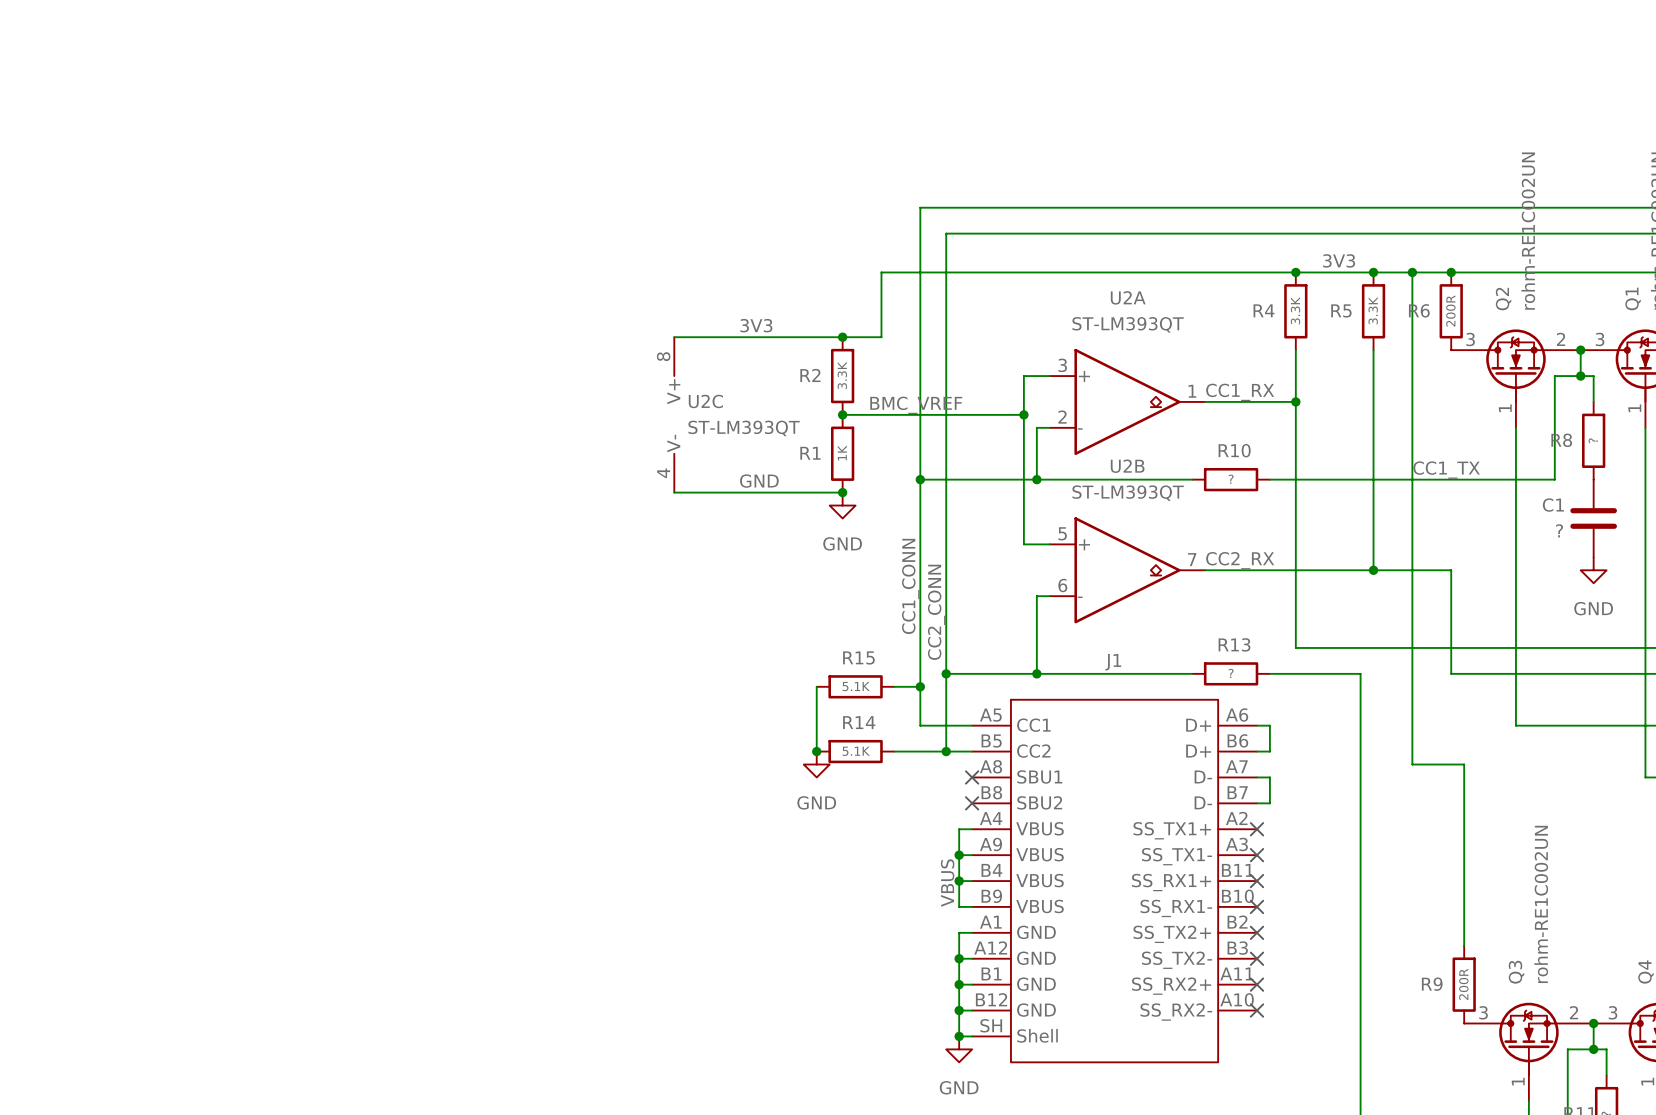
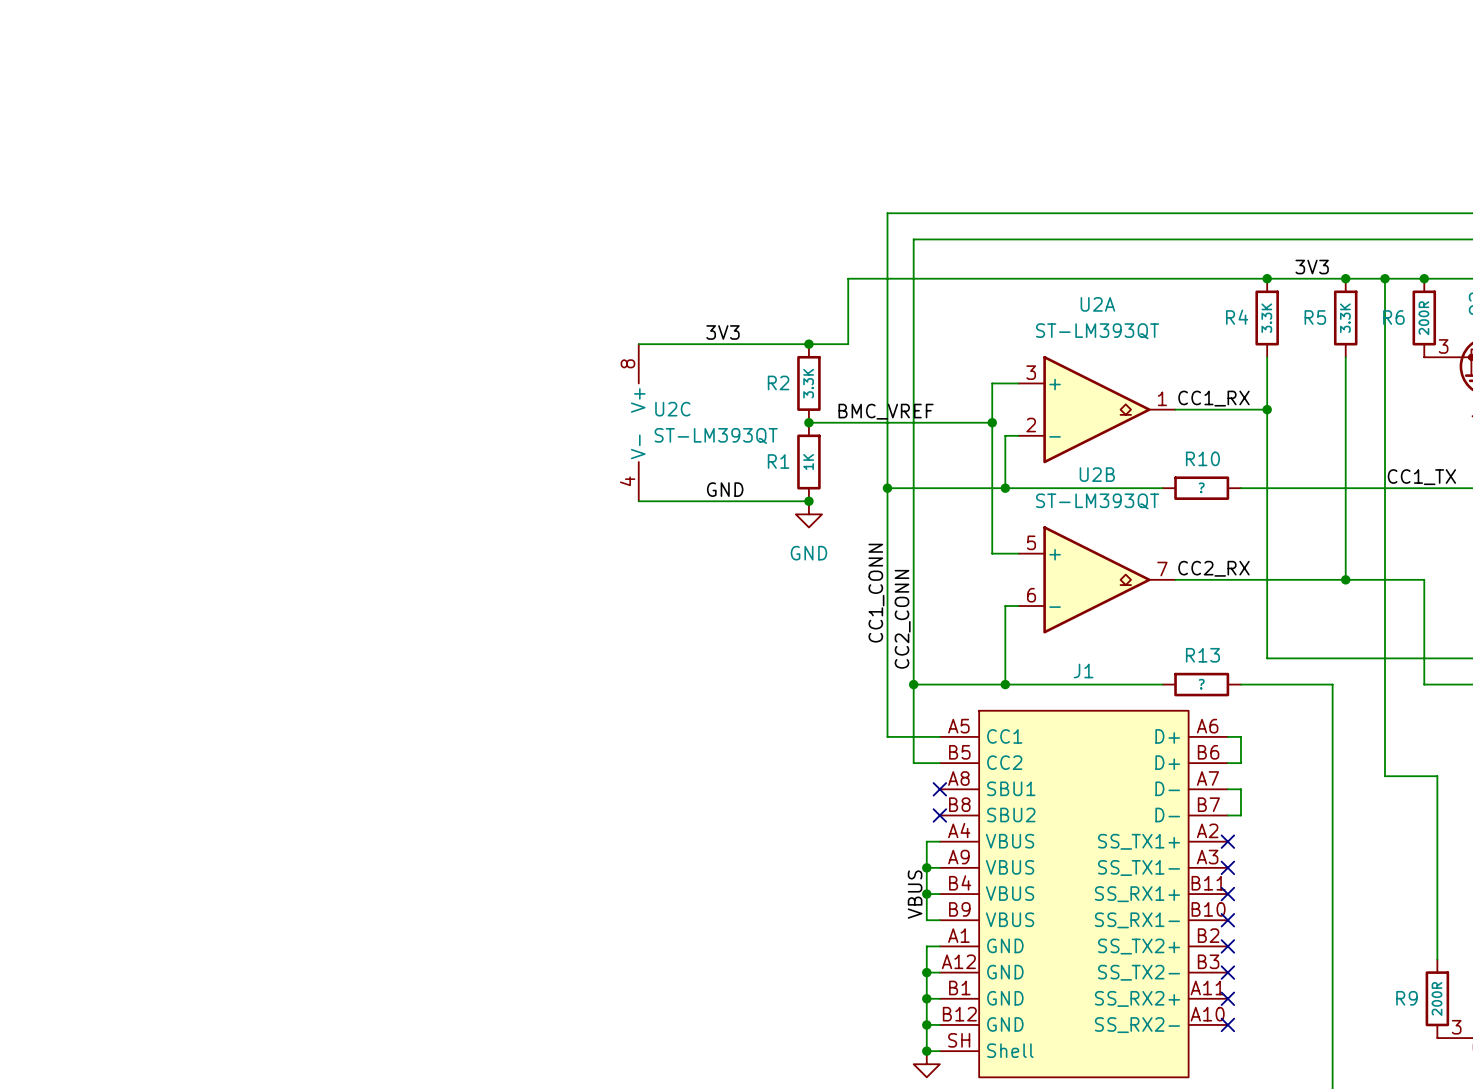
wire: (816, 686) (816, 751) -> none
R15: 5.1K (855, 686) -> none
wire: (894, 686) (920, 686) -> none
junction: (920, 686) -> none
junction: (816, 751) -> none
R14: 5.1K (855, 751) -> none
wire: (894, 751) (946, 751) -> none
junction: (946, 751) -> none
power symbol: GND (816, 764) -> none

